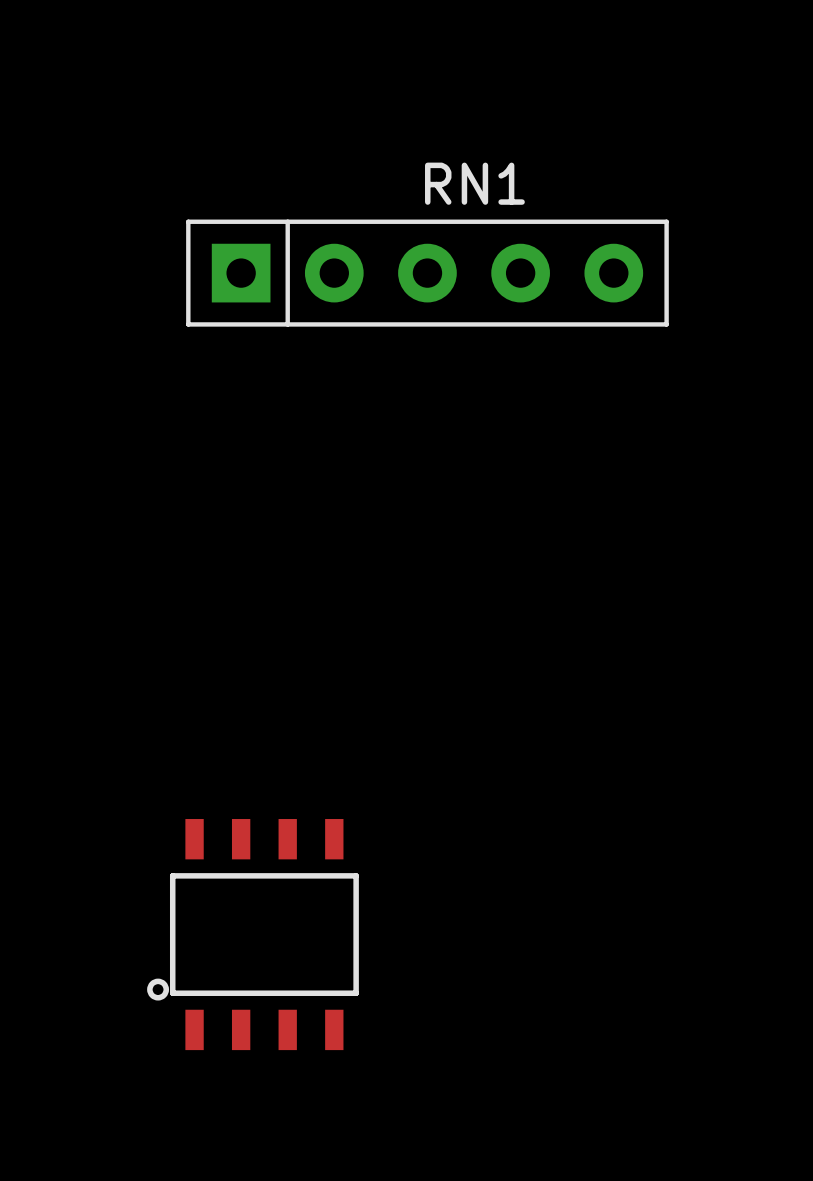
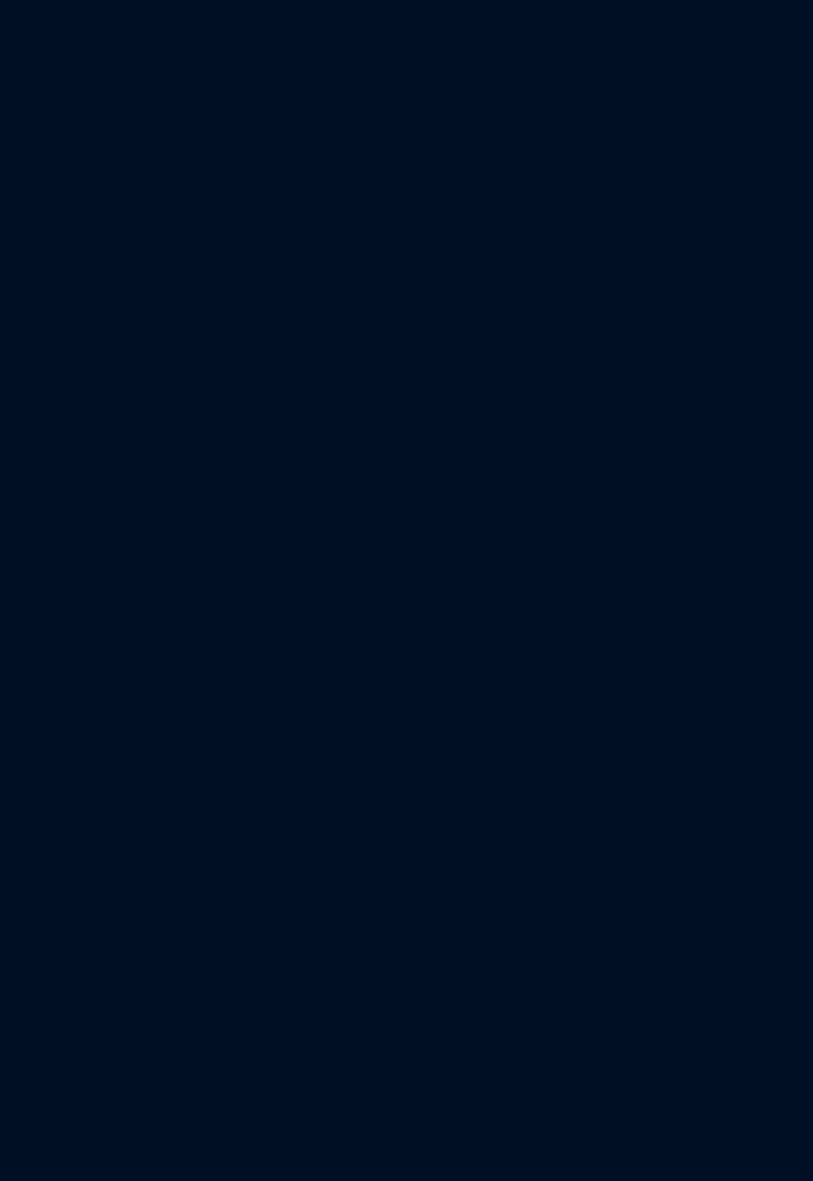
RN1: (427, 273) -> none
part: (252, 934) -> none

